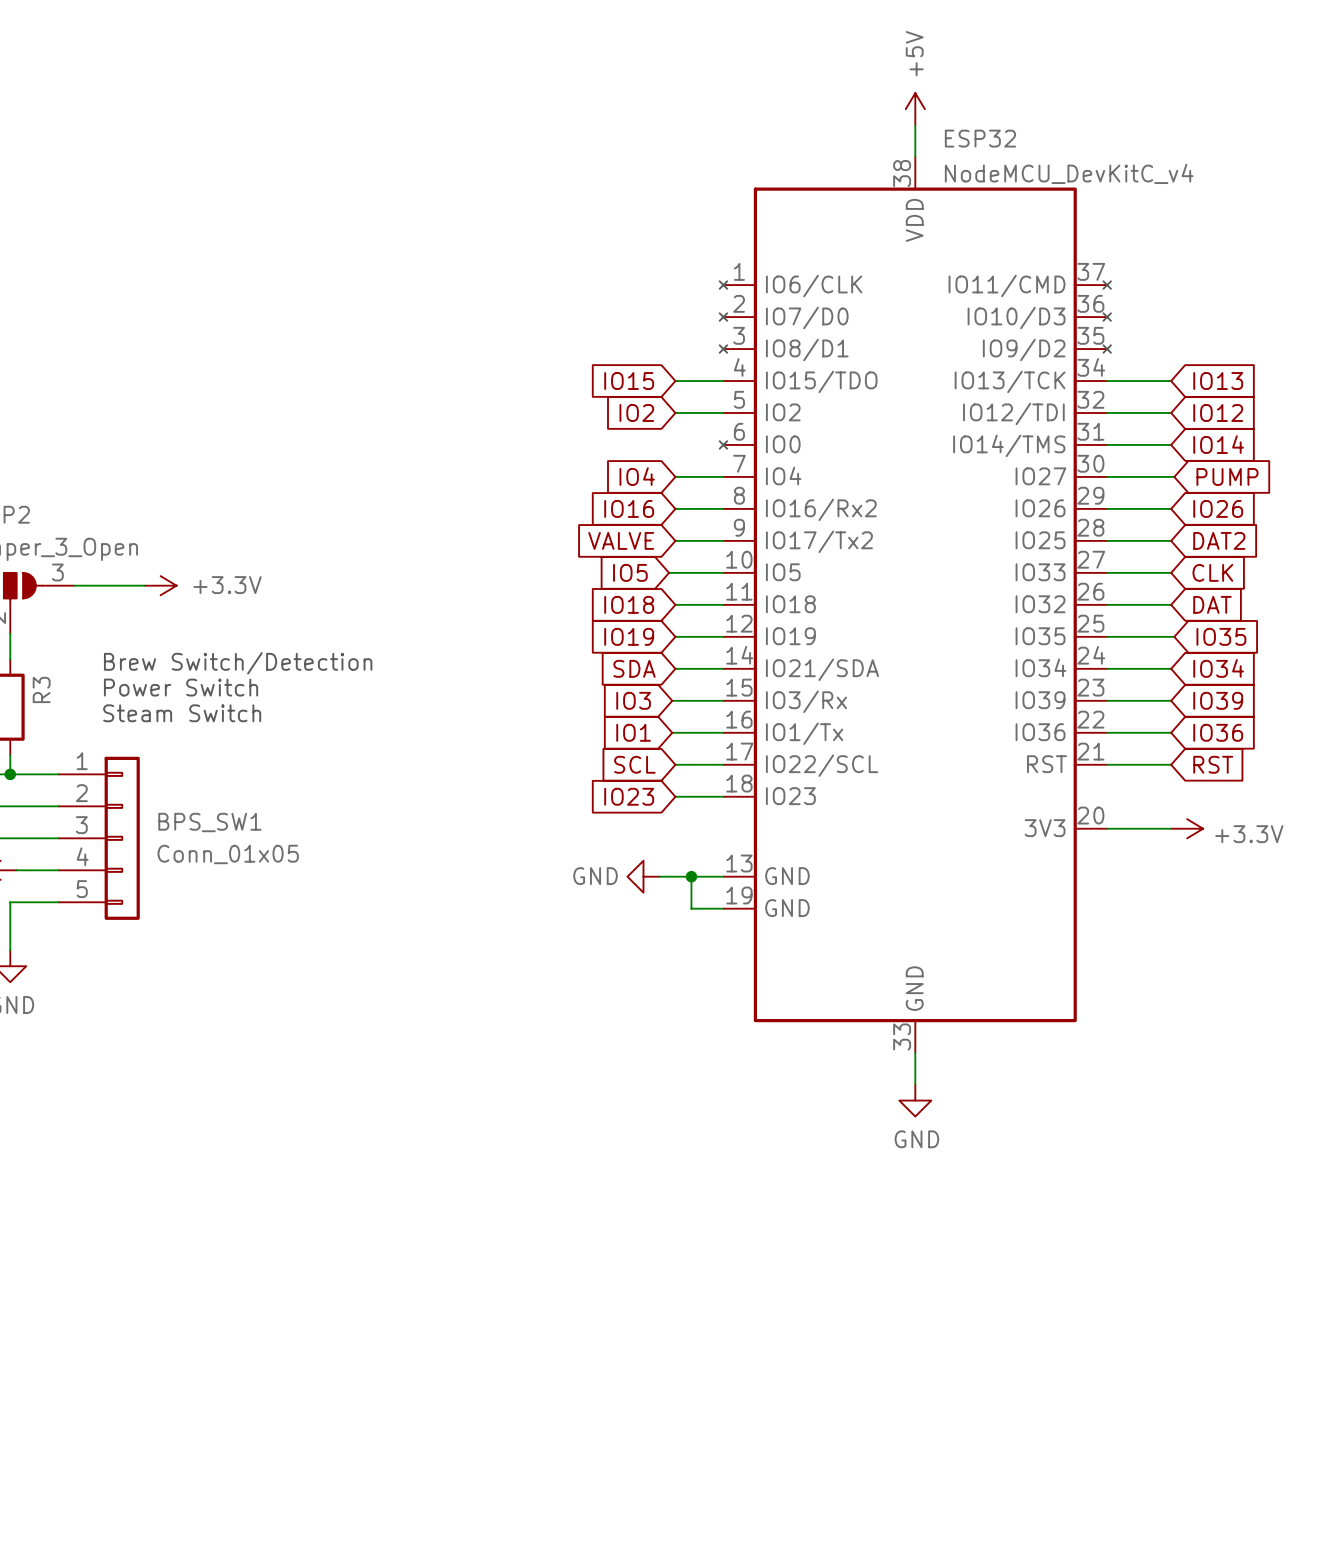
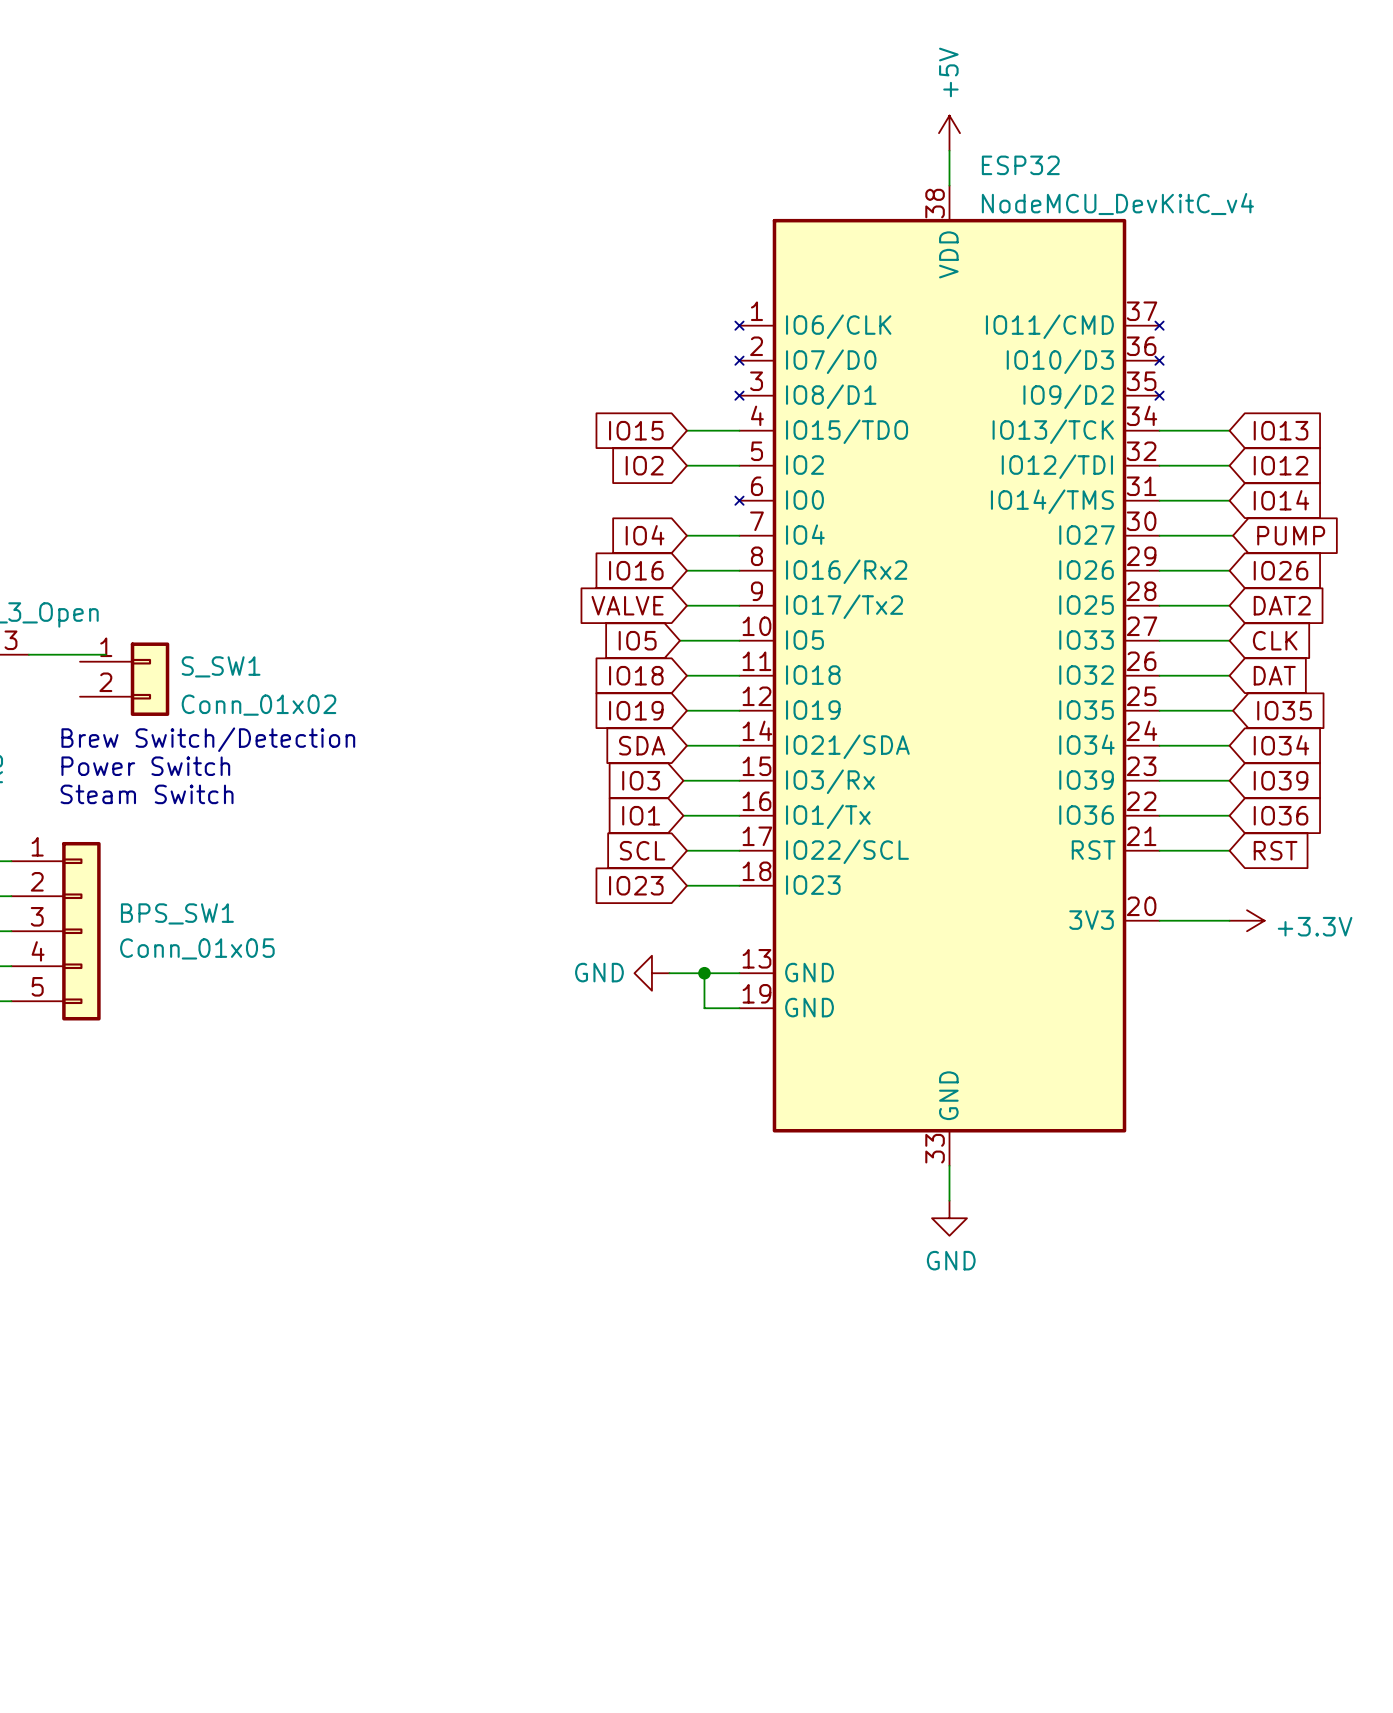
power symbol: +3.3V (160, 585) -> none
S_SW1: none -> Conn_01x02 (124, 679)

